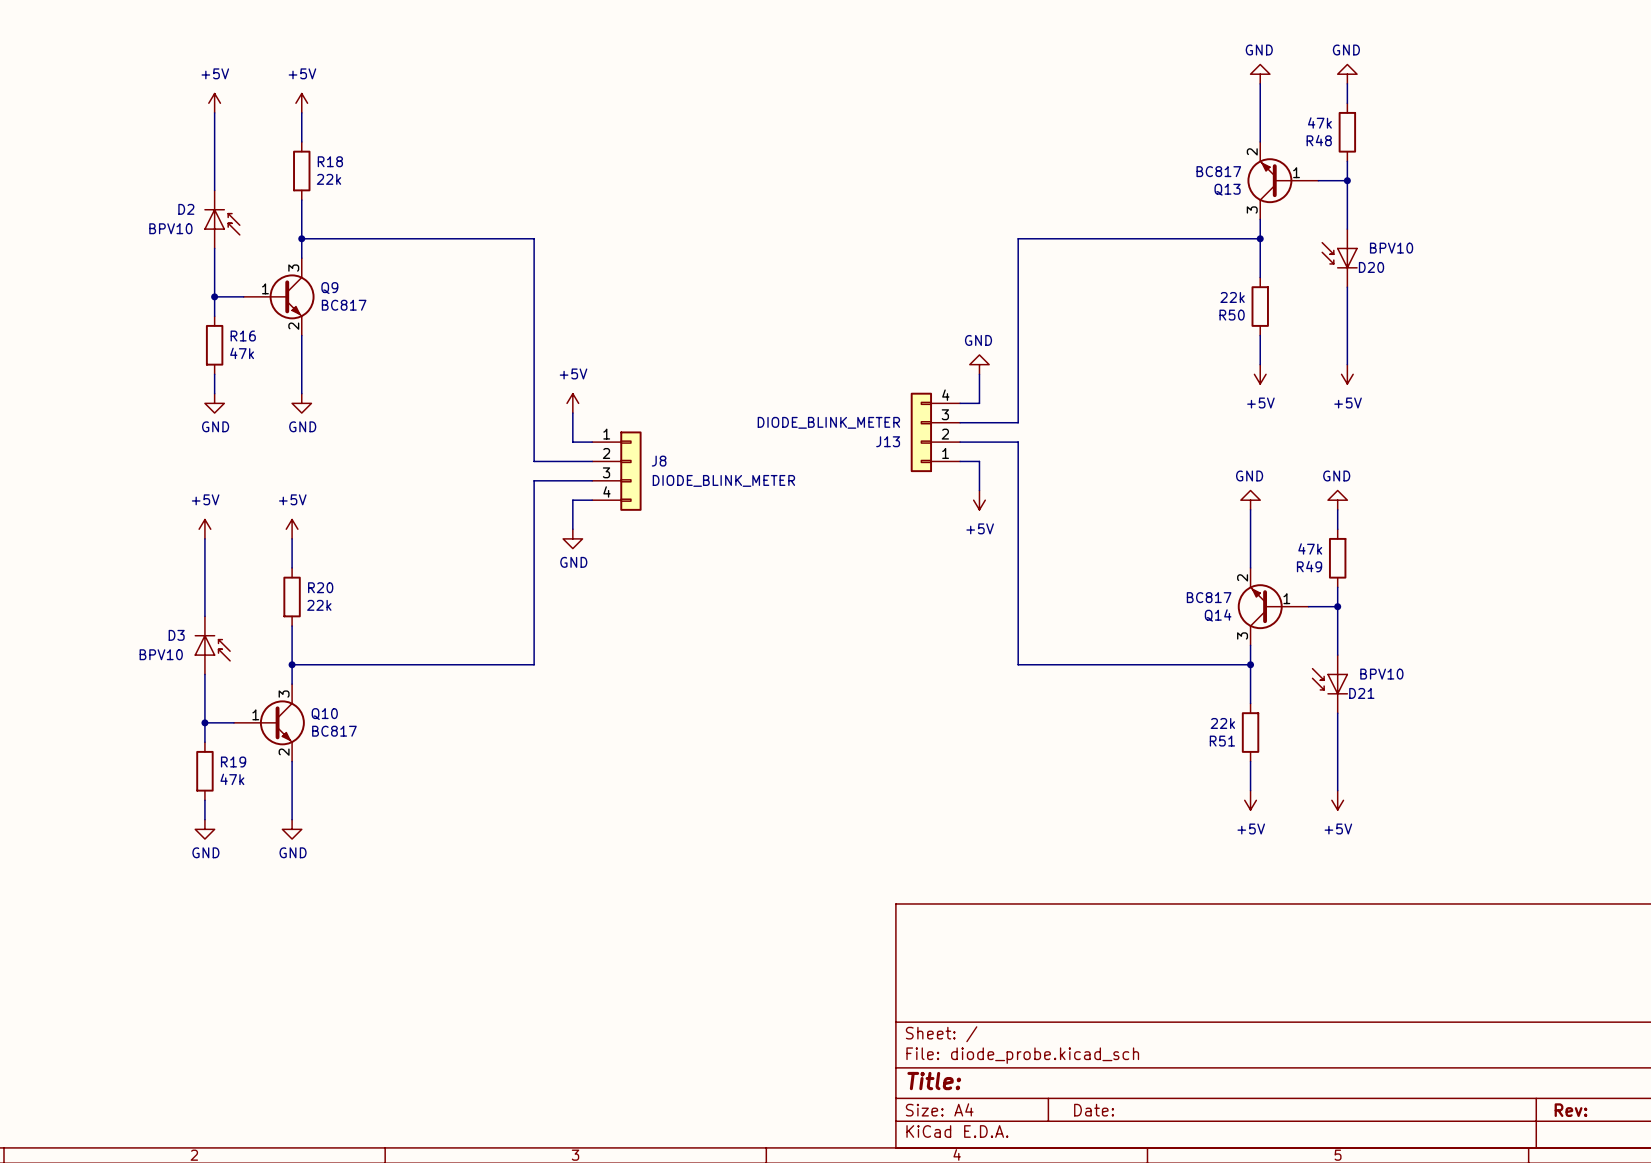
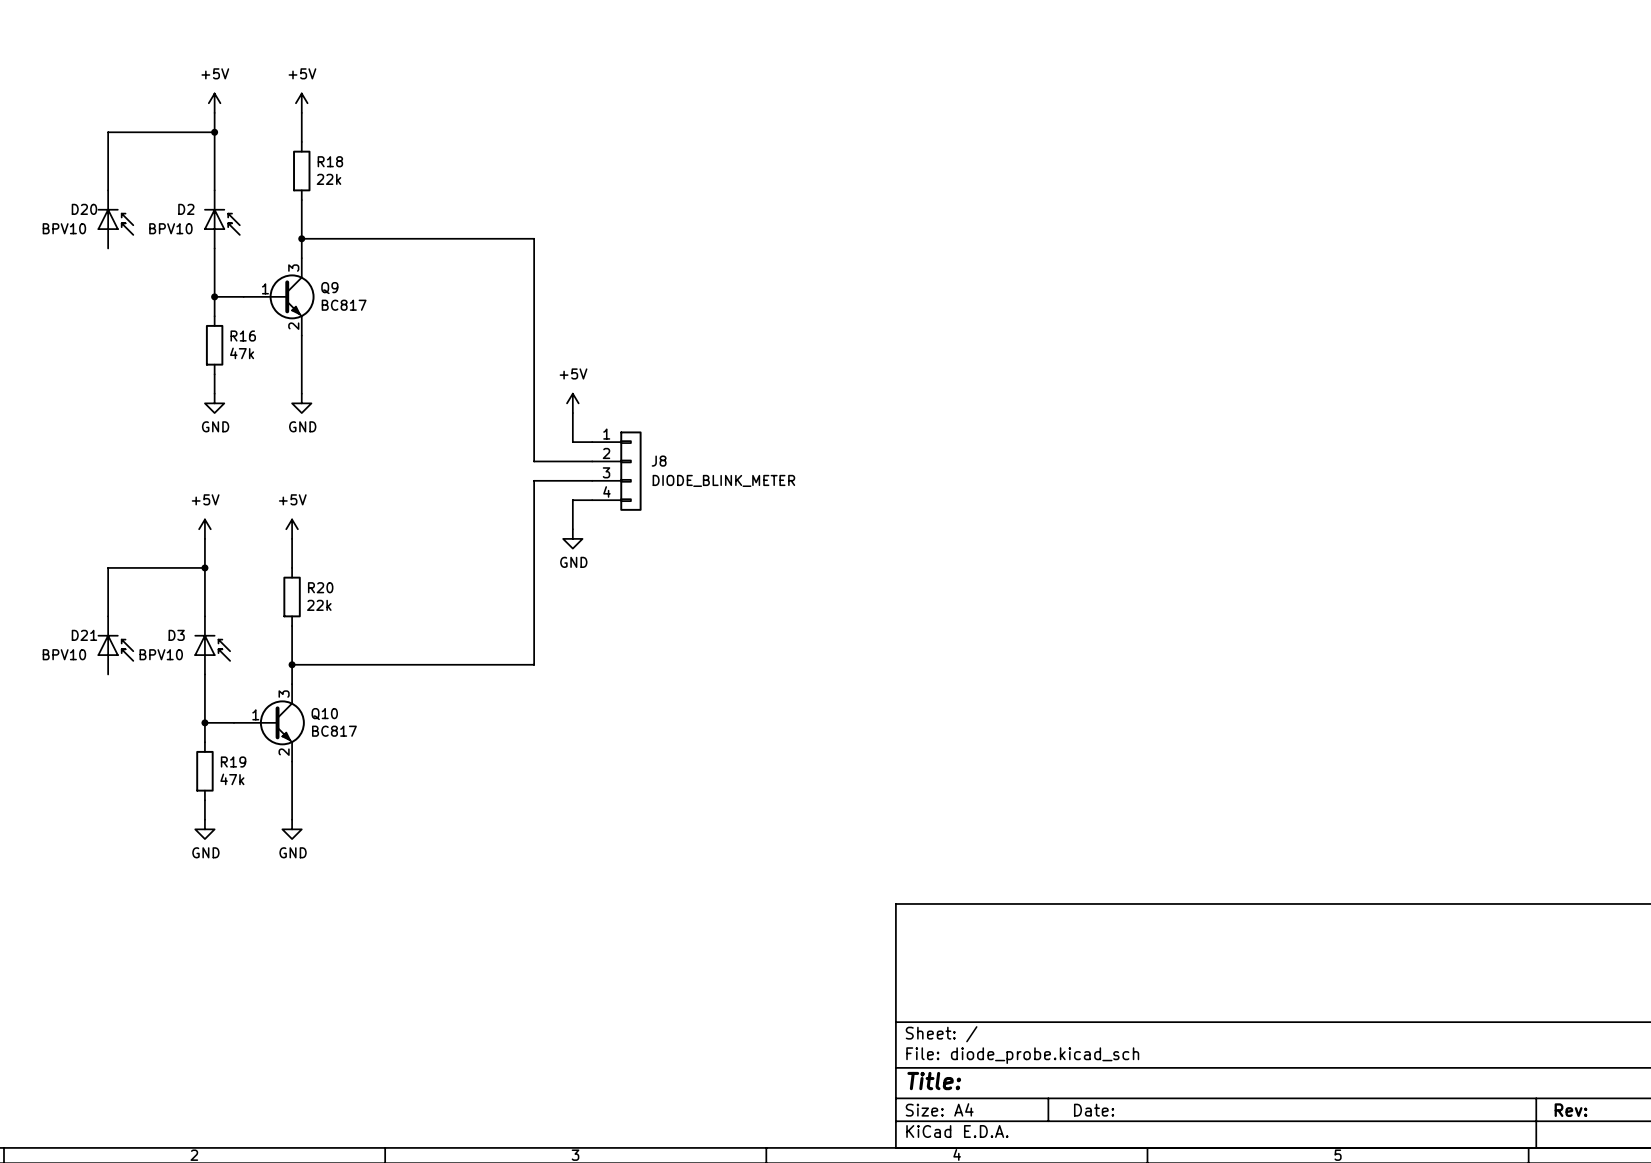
power symbol: GND (1260, 74) -> none
power symbol: GND (1347, 74) -> none
wire: (1260, 83) (1260, 141) -> none
wire: (1347, 83) (1347, 103) -> none
wire: none -> (214, 132) (108, 132) (108, 190)
junction: none -> (214, 132)
R48: 47k (1347, 132) -> none
wire: (1347, 161) (1347, 229) -> none
Q13: BC817 (1282, 180) -> none
wire: (1318, 180) (1347, 180) -> none
junction: (1347, 180) -> none
wire: (1260, 219) (1260, 277) -> none
wire: (1260, 238) (1018, 238) (1018, 422) (960, 422) -> none
junction: (1260, 238) -> none
D20 rotation: 0° (1339, 255) -> 180° (115, 222)
D20 position: (1339, 258) -> (115, 219)
wire: (1347, 287) (1347, 364) -> none
R50: 22k (1260, 306) -> none
wire: (1260, 335) (1260, 364) -> none
power symbol: GND (979, 364) -> none
wire: (979, 374) (979, 403) (960, 403) -> none
power symbol: +5V (1260, 374) -> none
power symbol: +5V (1347, 374) -> none
J13: DIODE_BLINK_METER (935, 432) -> none
wire: (960, 442) (1018, 442) (1018, 664) (1250, 664) -> none
wire: (960, 461) (979, 461) (979, 490) -> none
power symbol: +5V (979, 500) -> none
power symbol: GND (1250, 500) -> none
power symbol: GND (1337, 500) -> none
wire: (1250, 509) (1250, 567) -> none
wire: (1337, 509) (1337, 529) -> none
R49: 47k (1337, 558) -> none
wire: none -> (204, 567) (108, 567) (108, 616)
junction: none -> (204, 567)
wire: (1337, 587) (1337, 655) -> none
Q14: BC817 (1273, 606) -> none
wire: (1308, 606) (1337, 606) -> none
junction: (1337, 606) -> none
wire: (1250, 645) (1250, 703) -> none
junction: (1250, 664) -> none
D21 rotation: 0° (1330, 681) -> 180° (115, 648)
D21 position: (1330, 684) -> (115, 645)
wire: (1337, 713) (1337, 790) -> none
R51: 22k (1250, 732) -> none
wire: (1250, 761) (1250, 790) -> none
power symbol: +5V (1250, 800) -> none
power symbol: +5V (1337, 800) -> none

